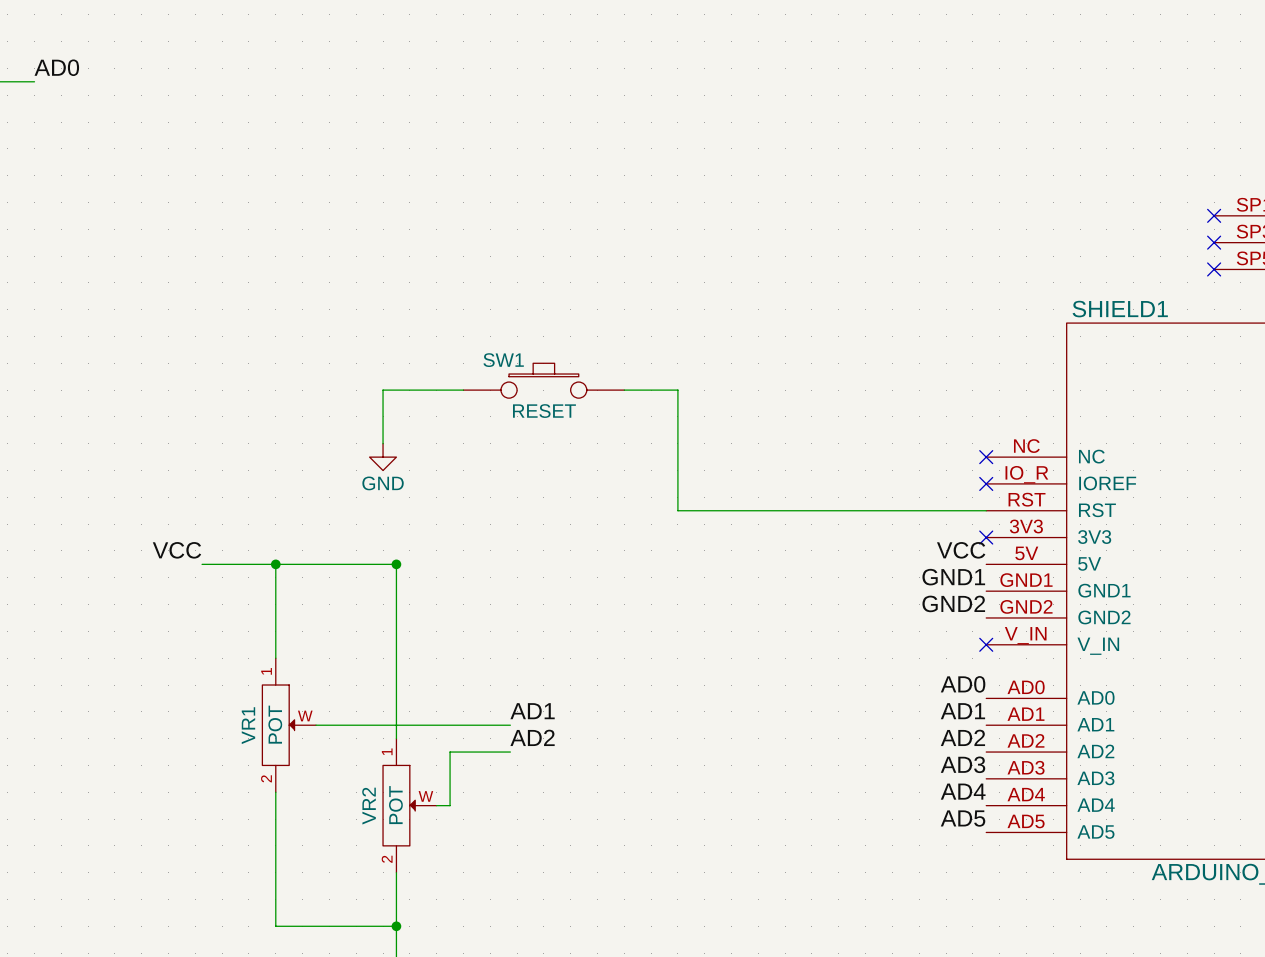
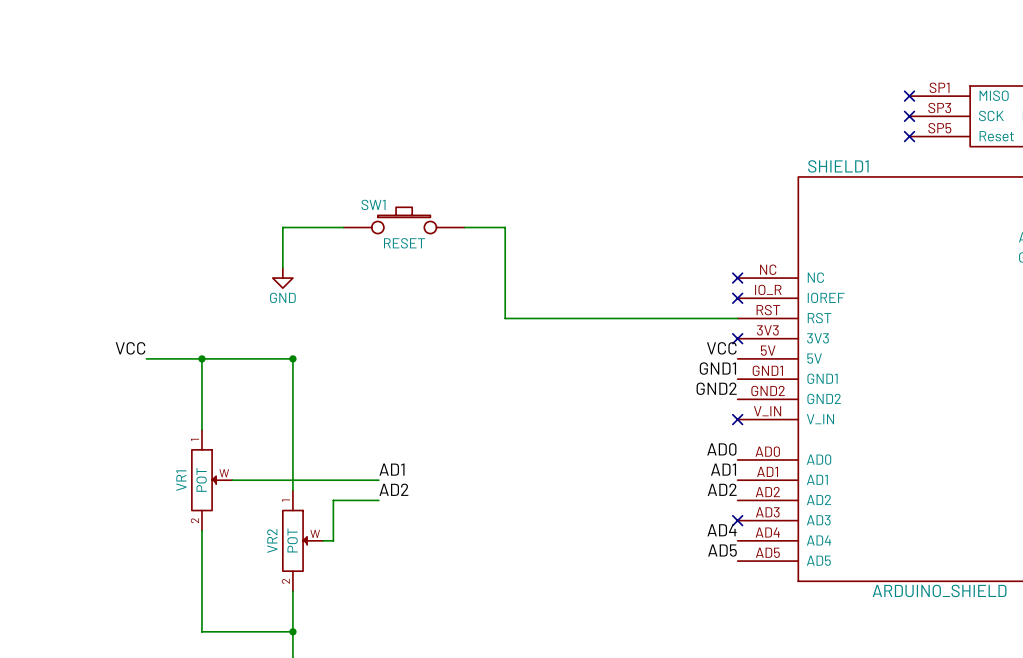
label: AD3 (963, 764) -> none
no-connect mark: none -> (737, 520)

